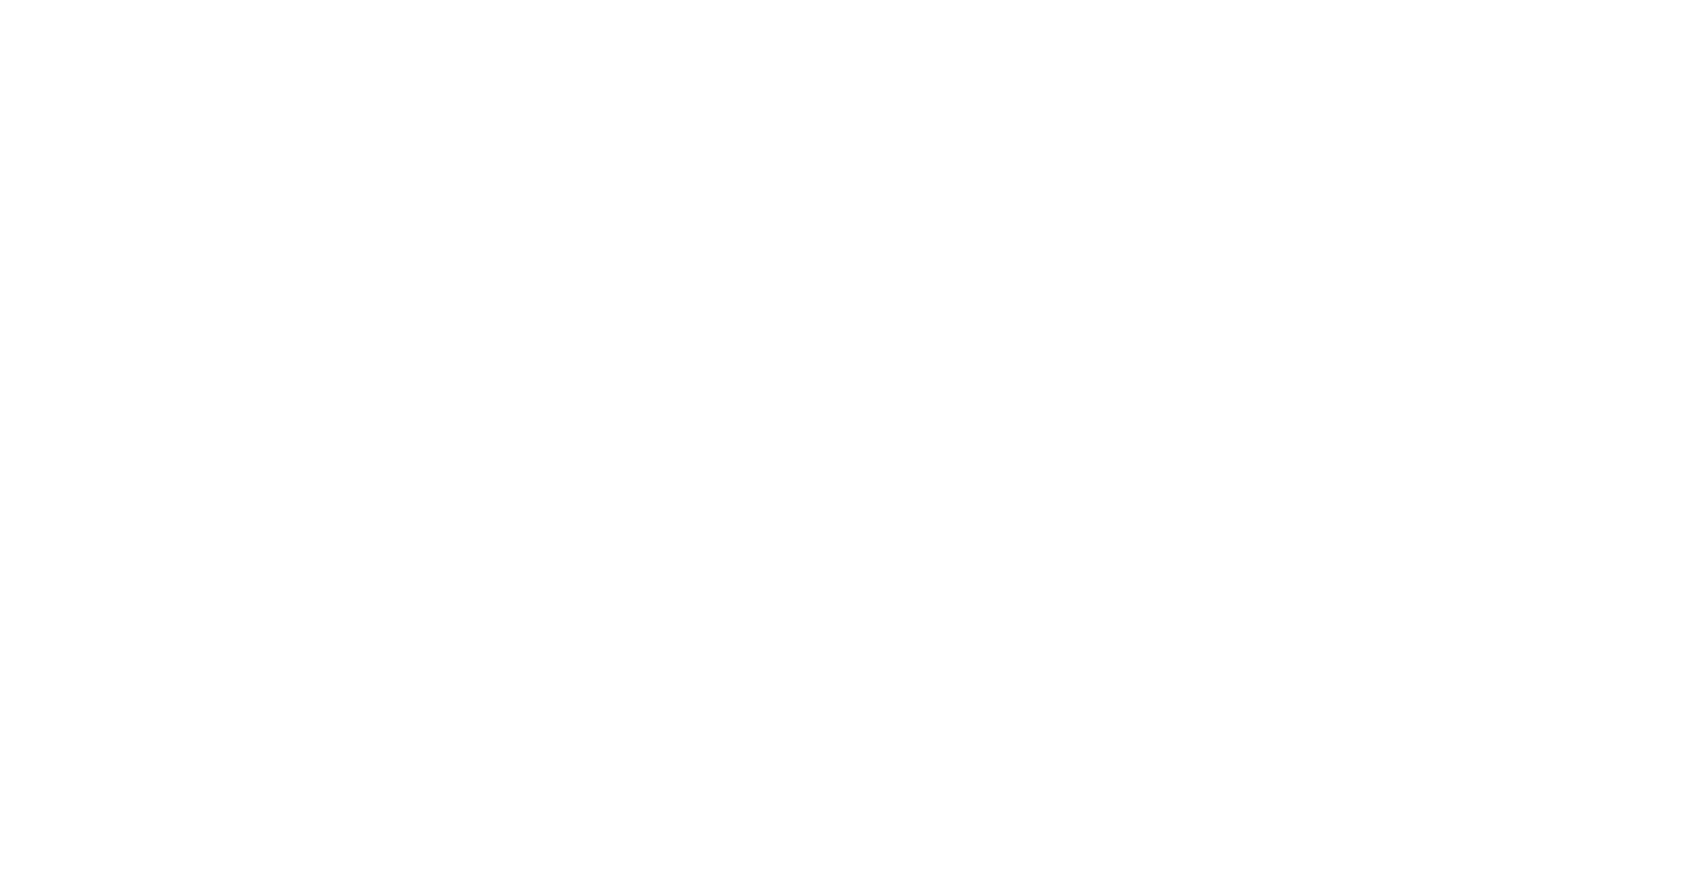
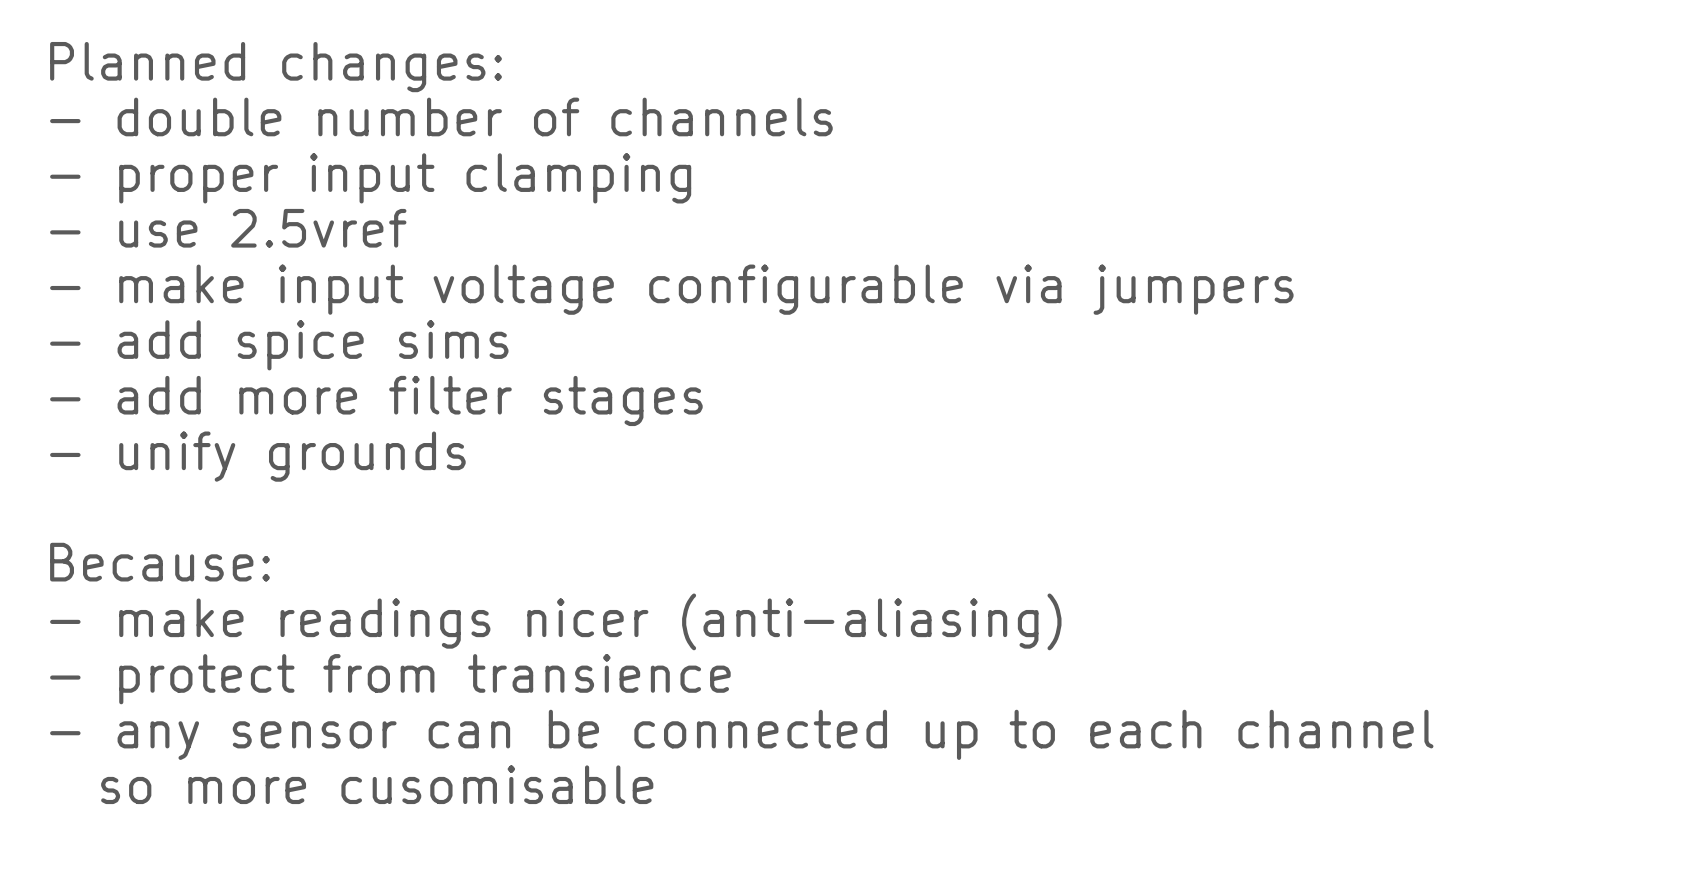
text: none -> Planned changes: (276, 67)
text: none -> - double number of channels (441, 116)
text: none -> - proper input clamping (370, 178)
text: none -> - use 2.5vref (228, 228)
text: none -> - make input voltage configurable via jumpers (671, 289)
text: none -> - add spice sims (279, 345)
text: none -> - add more filter stages (376, 400)
text: none -> - unify grounds (257, 456)
text: none -> Because: (159, 562)
text: none -> - make readings nicer (anti-aliasing) (555, 621)
text: none -> - protect from transience (390, 679)
text: none -> - any sensor can be connected up to each channel (741, 734)
text: none -> so more cusomisable (377, 784)

